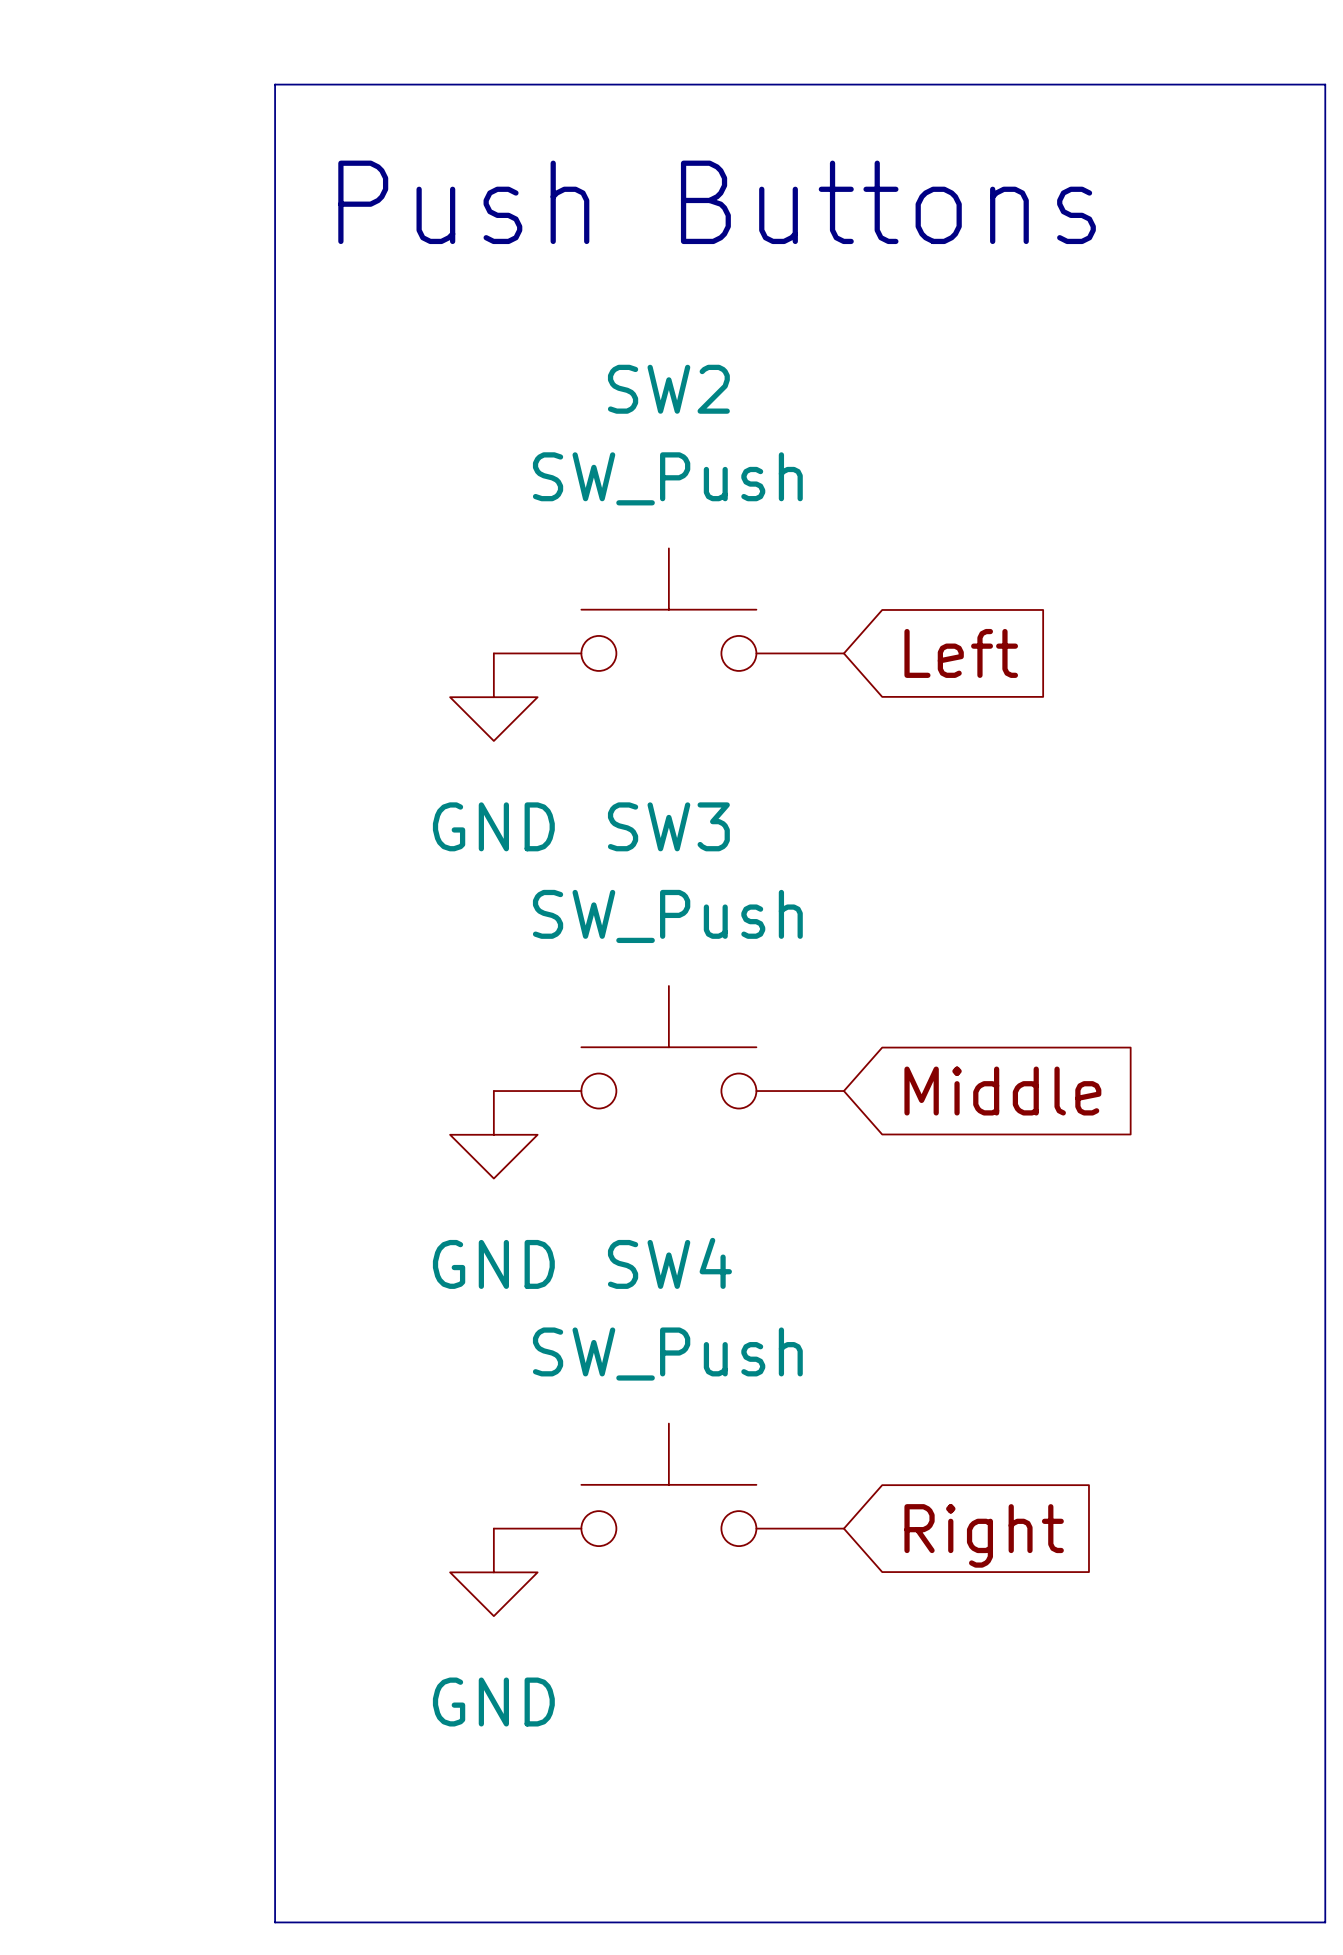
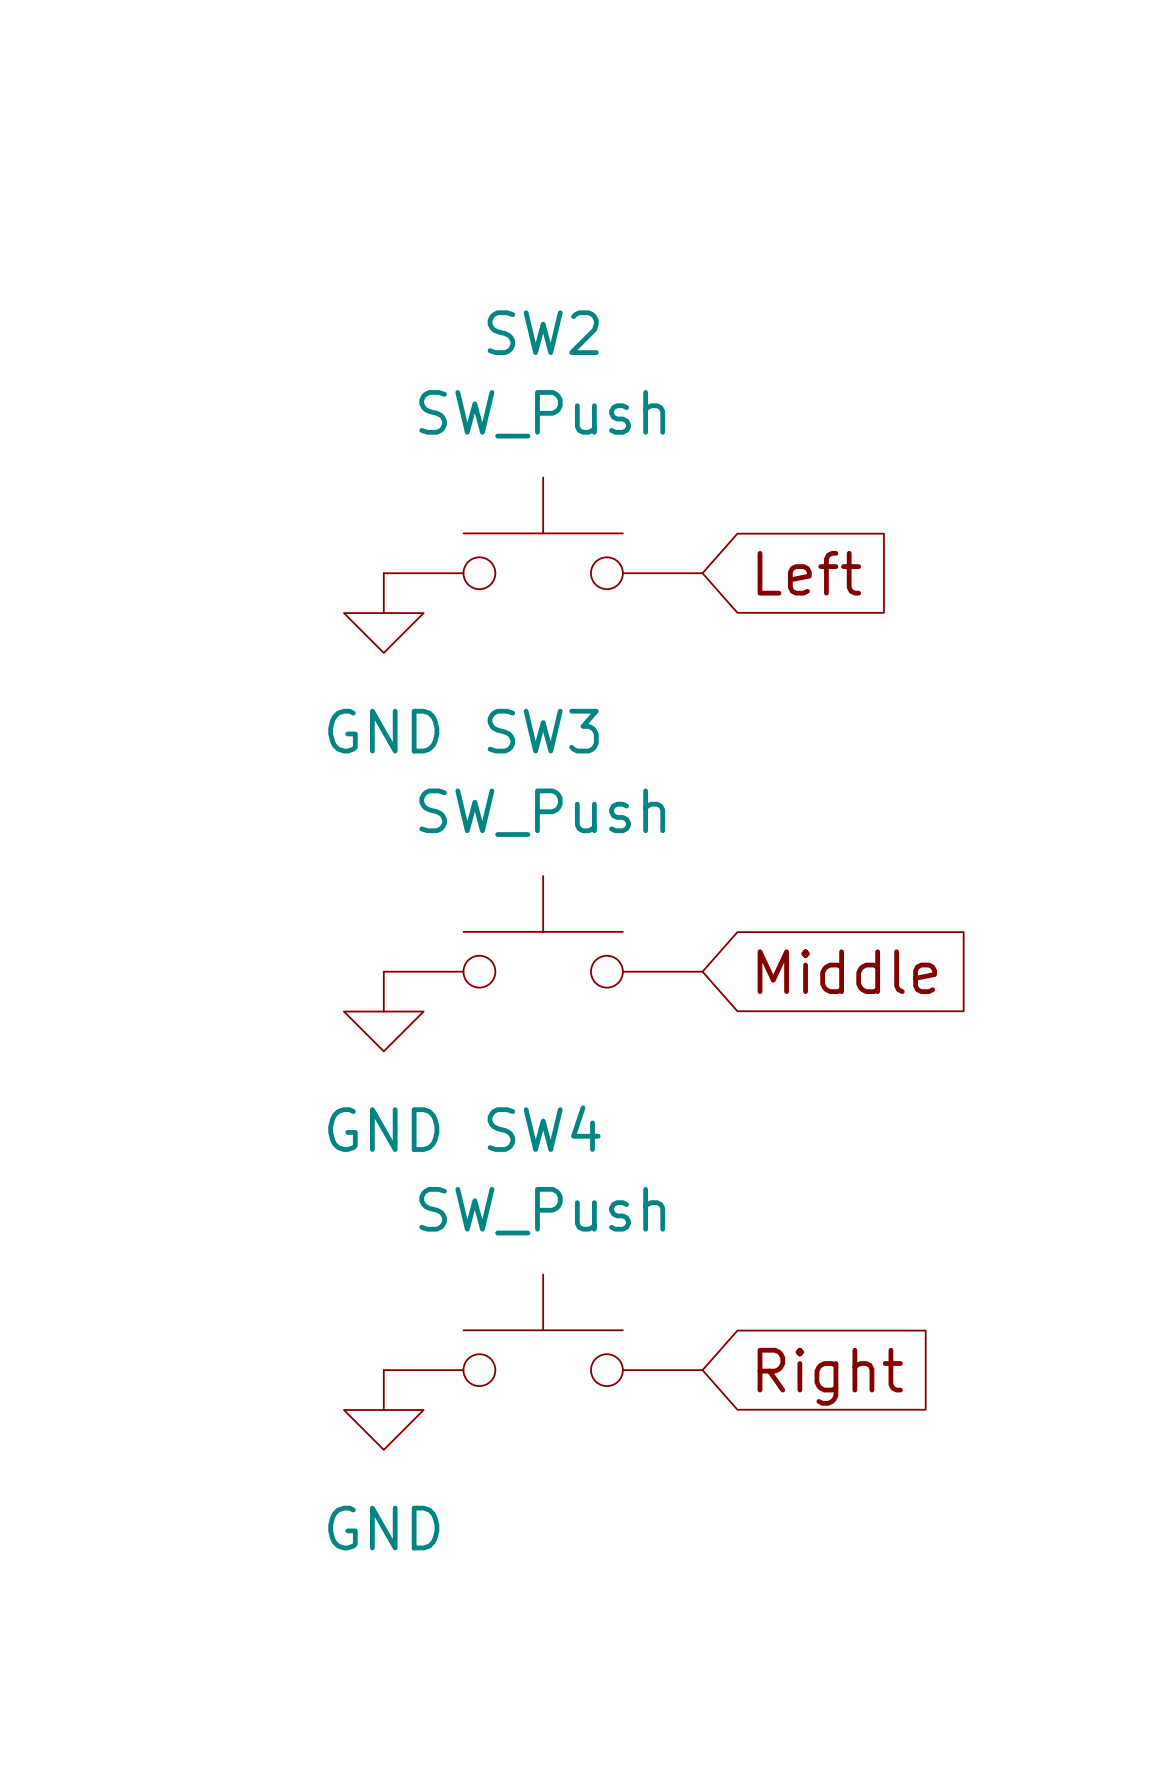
line: (275, 84) (1325, 84) (1325, 1922) (275, 1922) (275, 84) -> none
text: Push Buttons (717, 202) -> none

